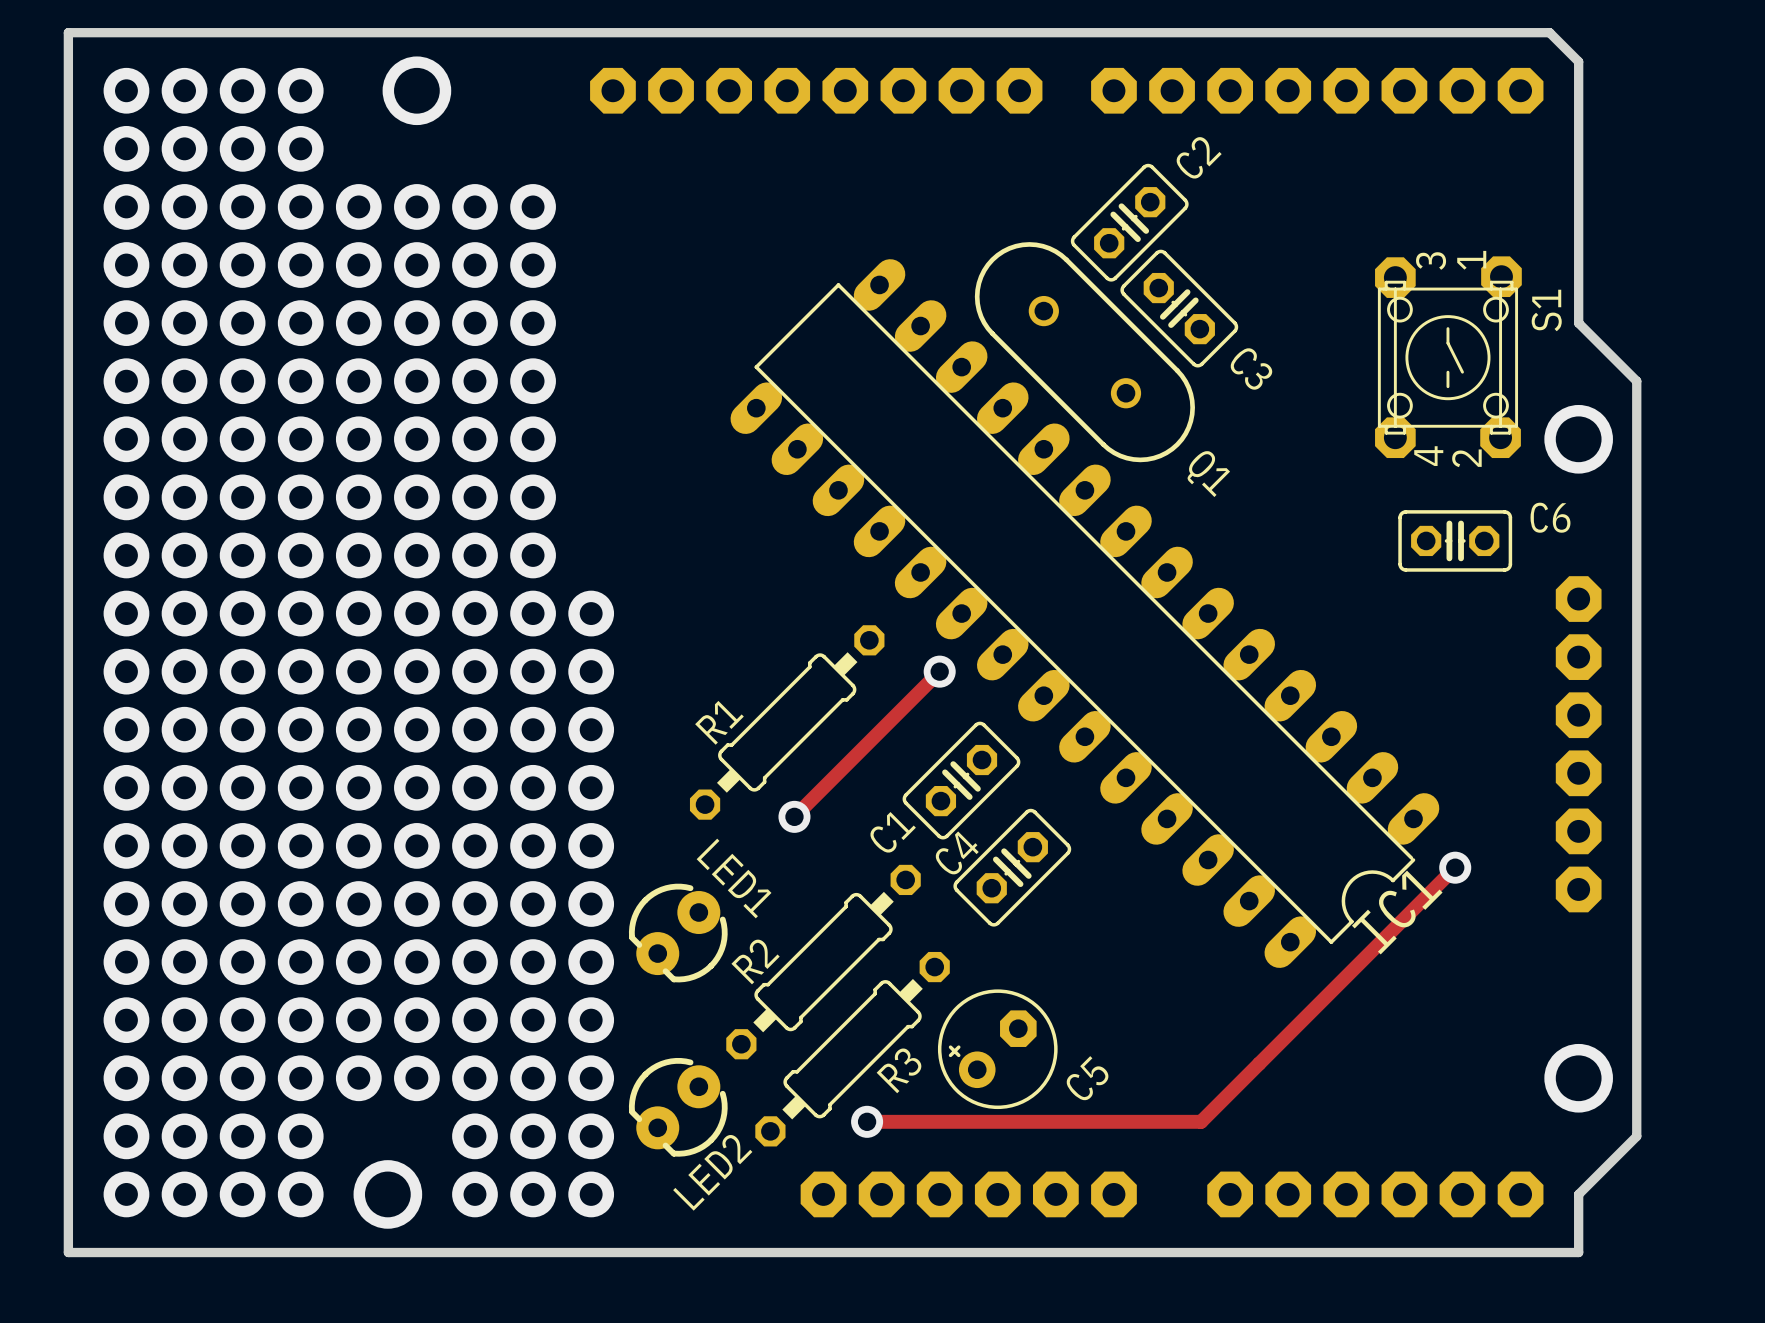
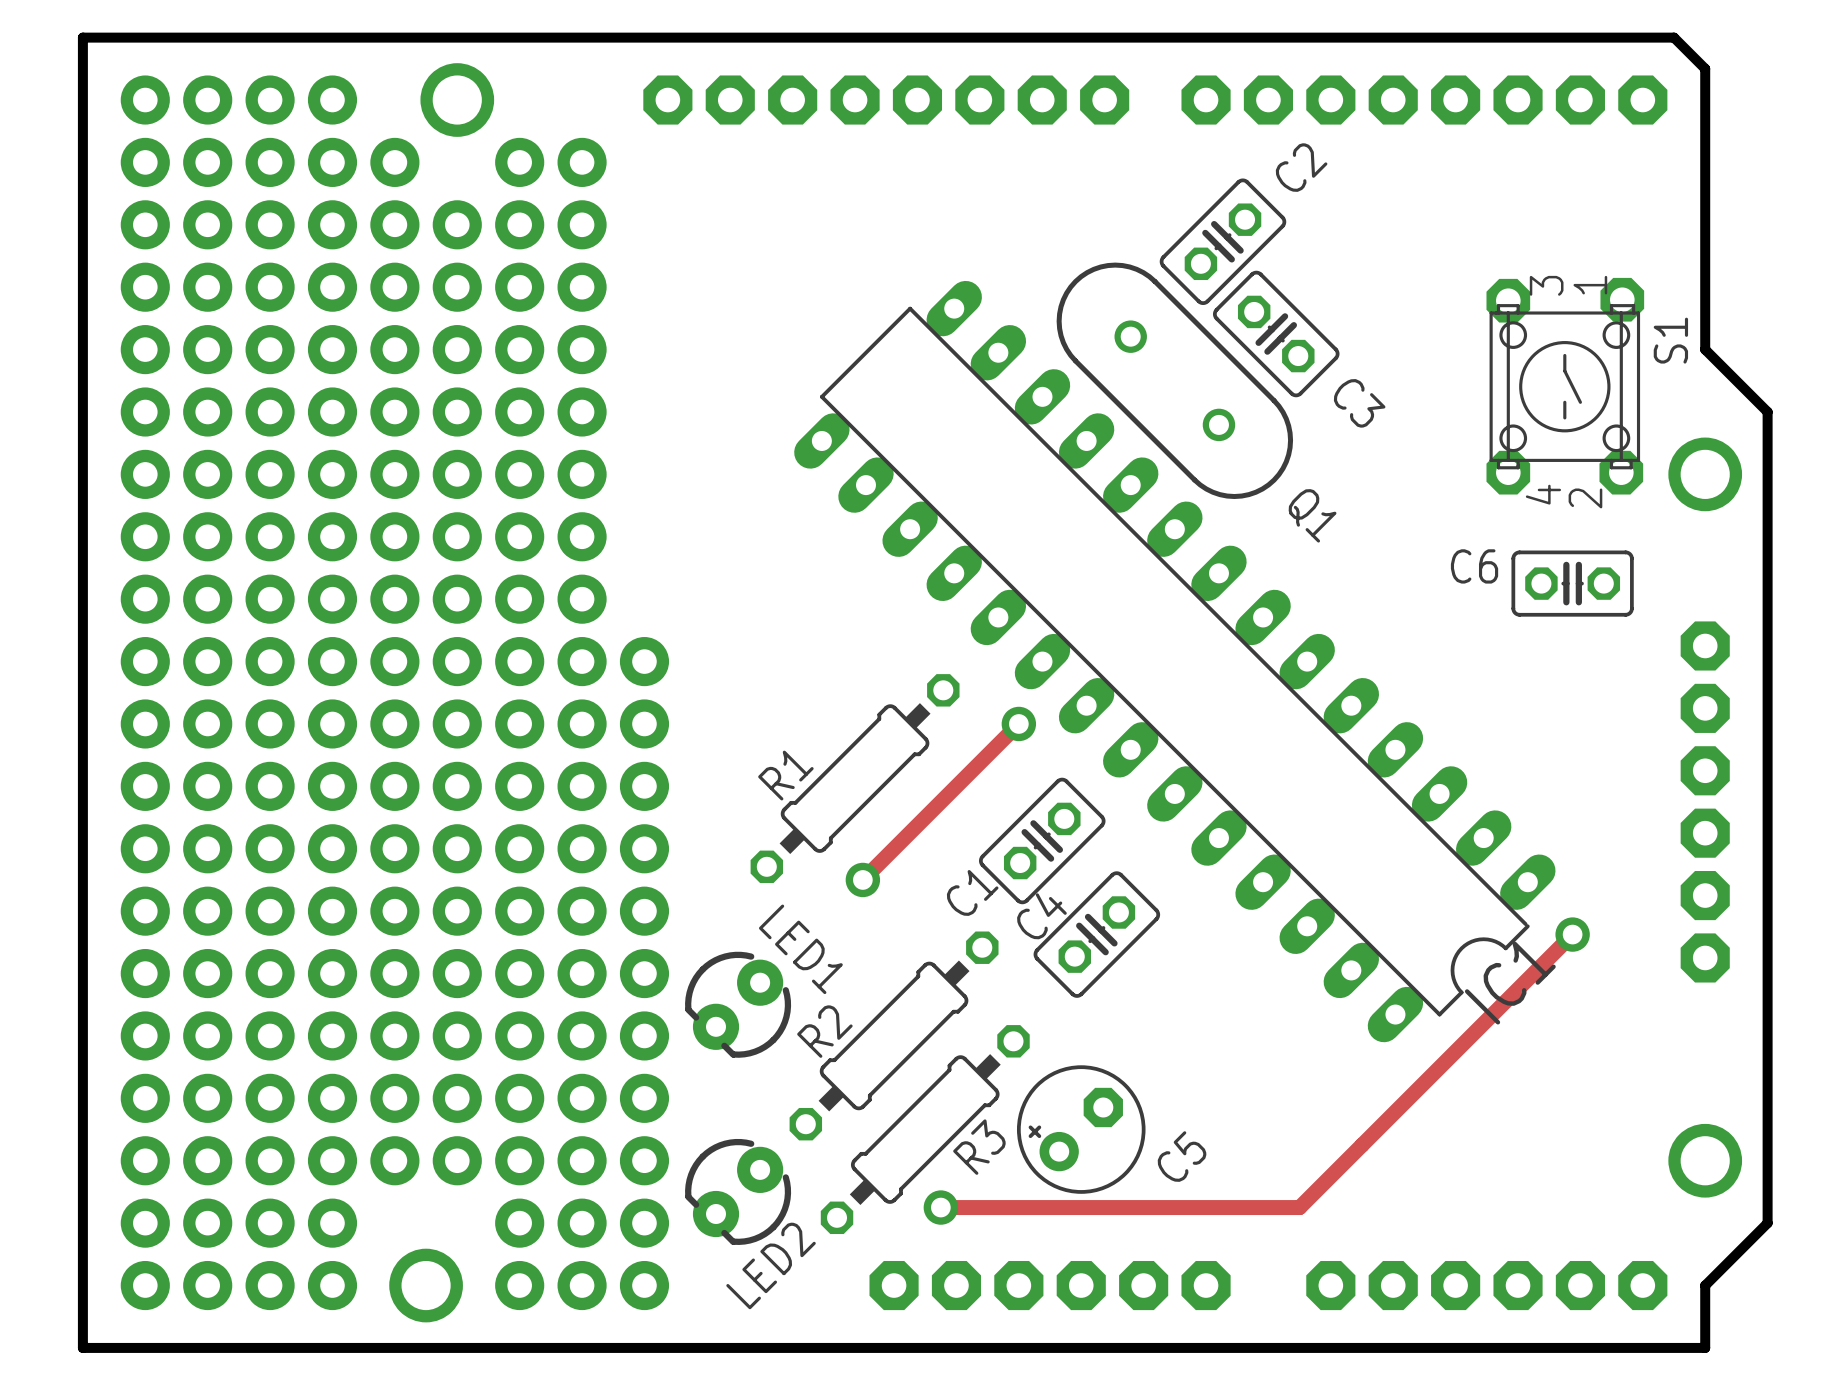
via: none -> (394, 162)
via: none -> (519, 162)
via: none -> (582, 162)
C6 name position: C6 (1550, 517) -> C6 (1474, 566)

